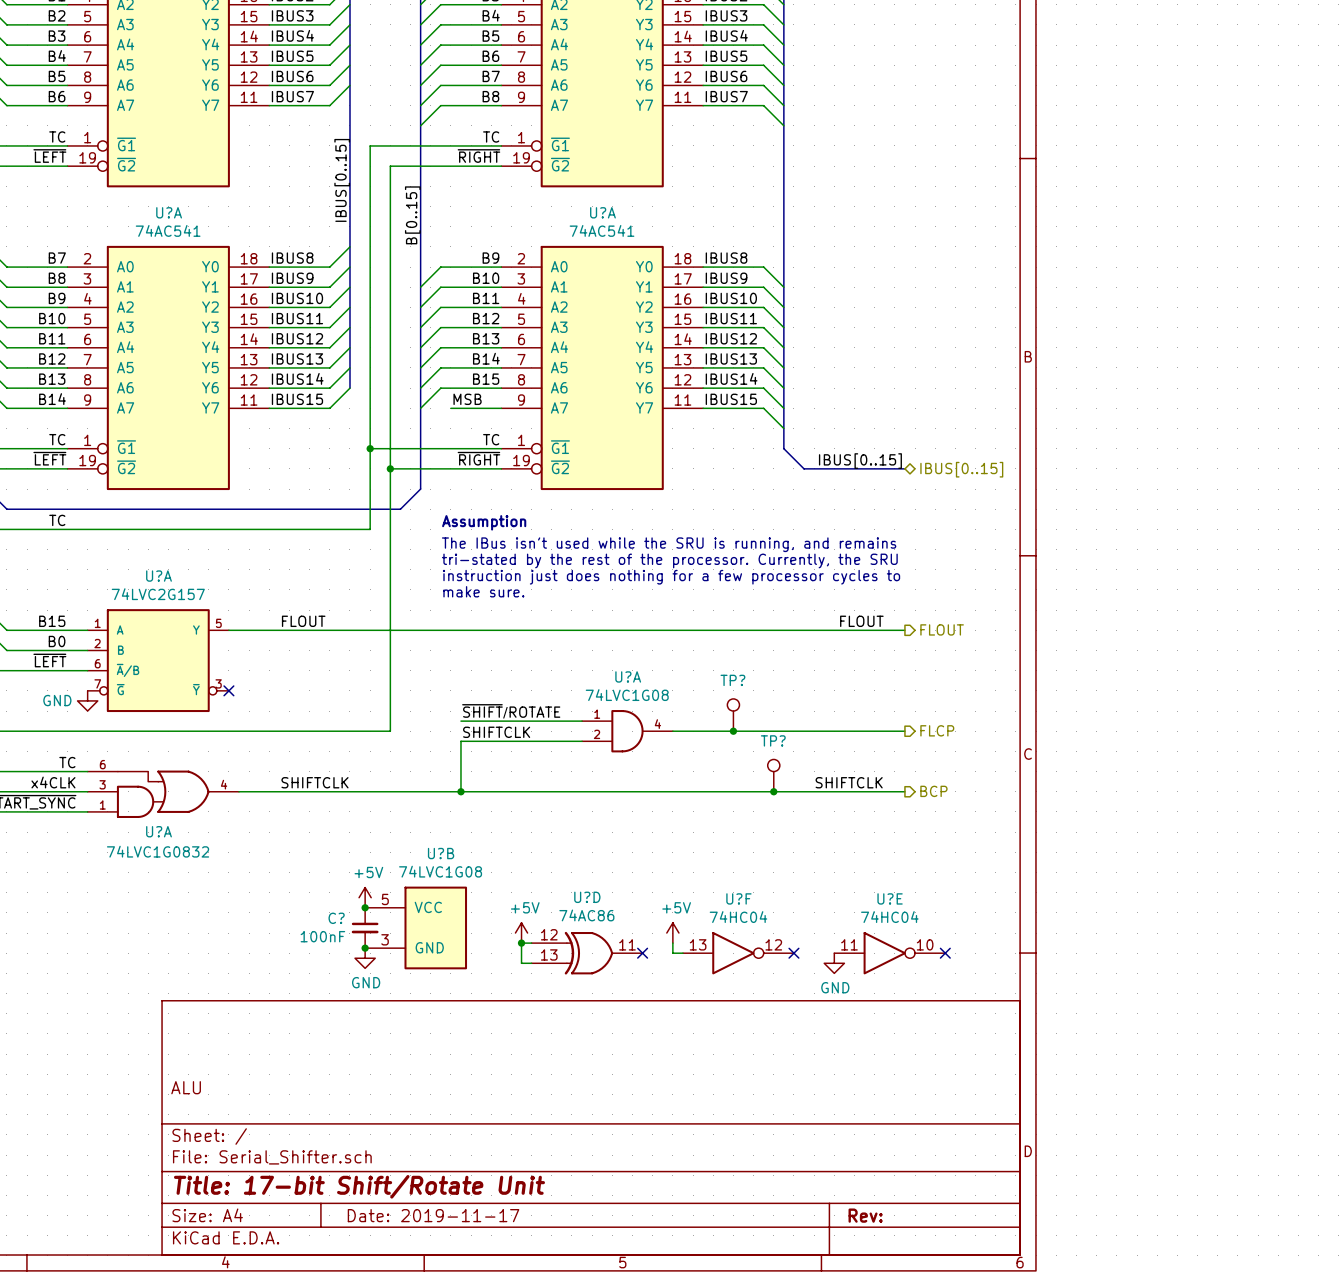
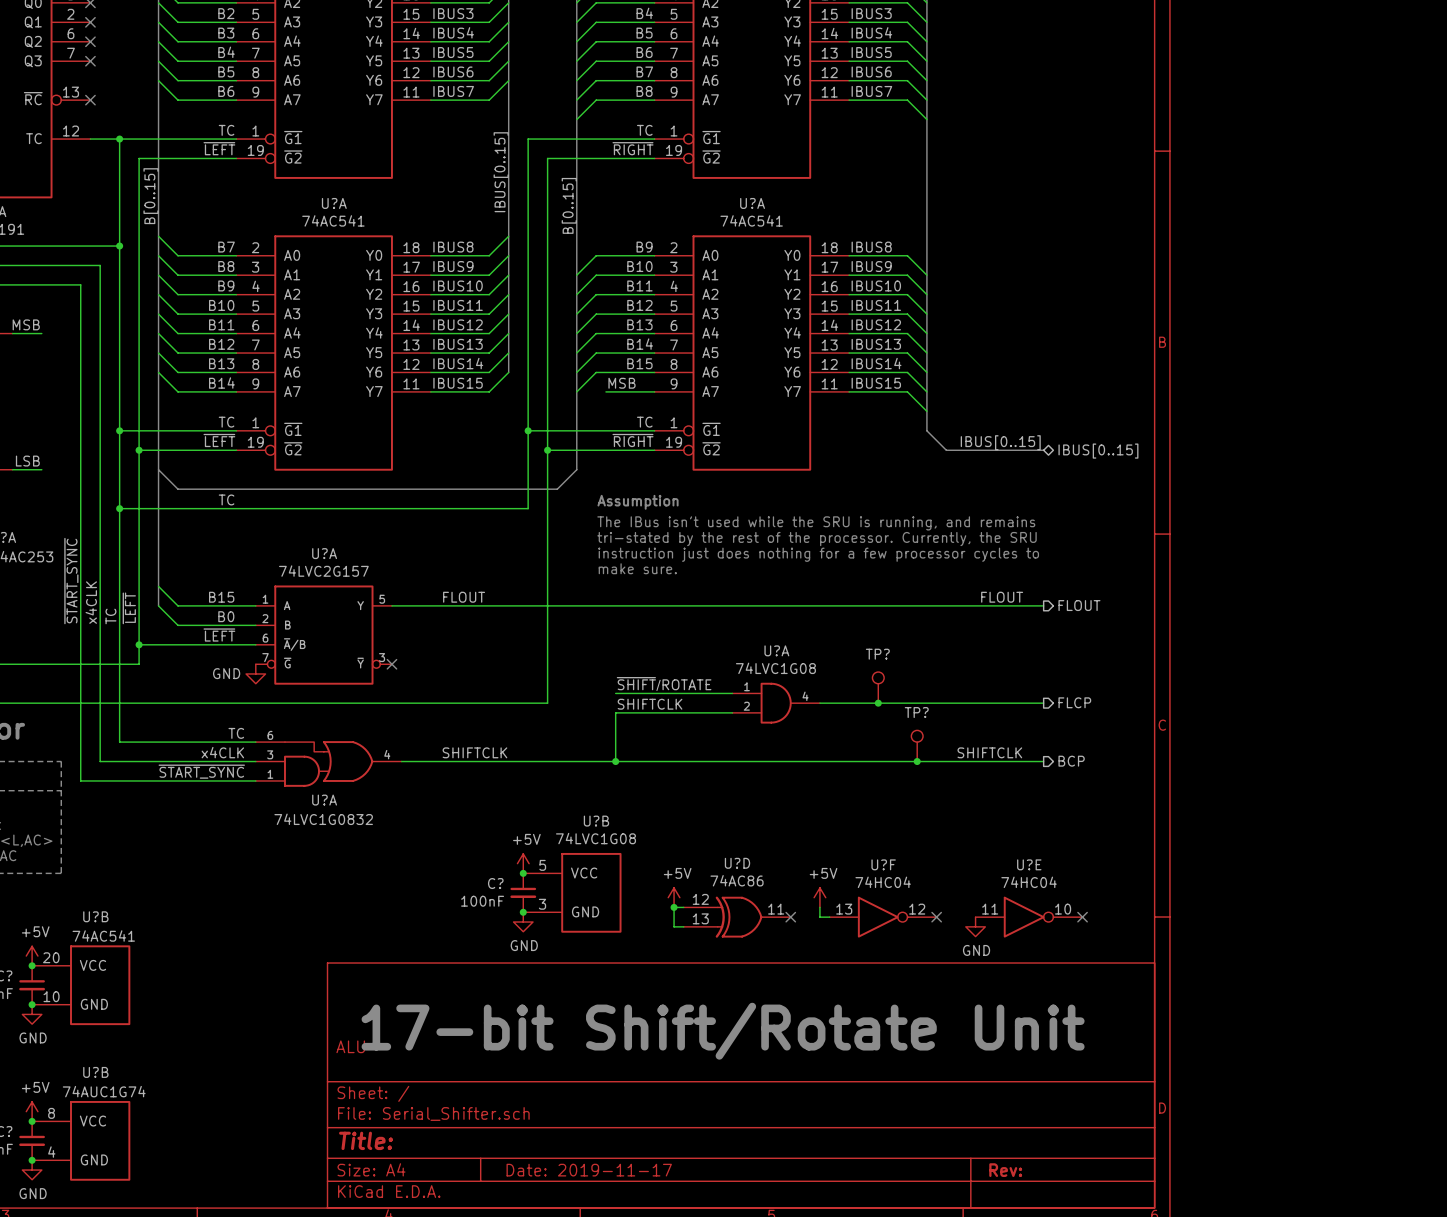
text: none -> 17-bit Shift/Rotate Unit (723, 1031)
title block: Title: 17-bit Shift/Rotate Unit (359, 1186) -> Title: (366, 1140)

